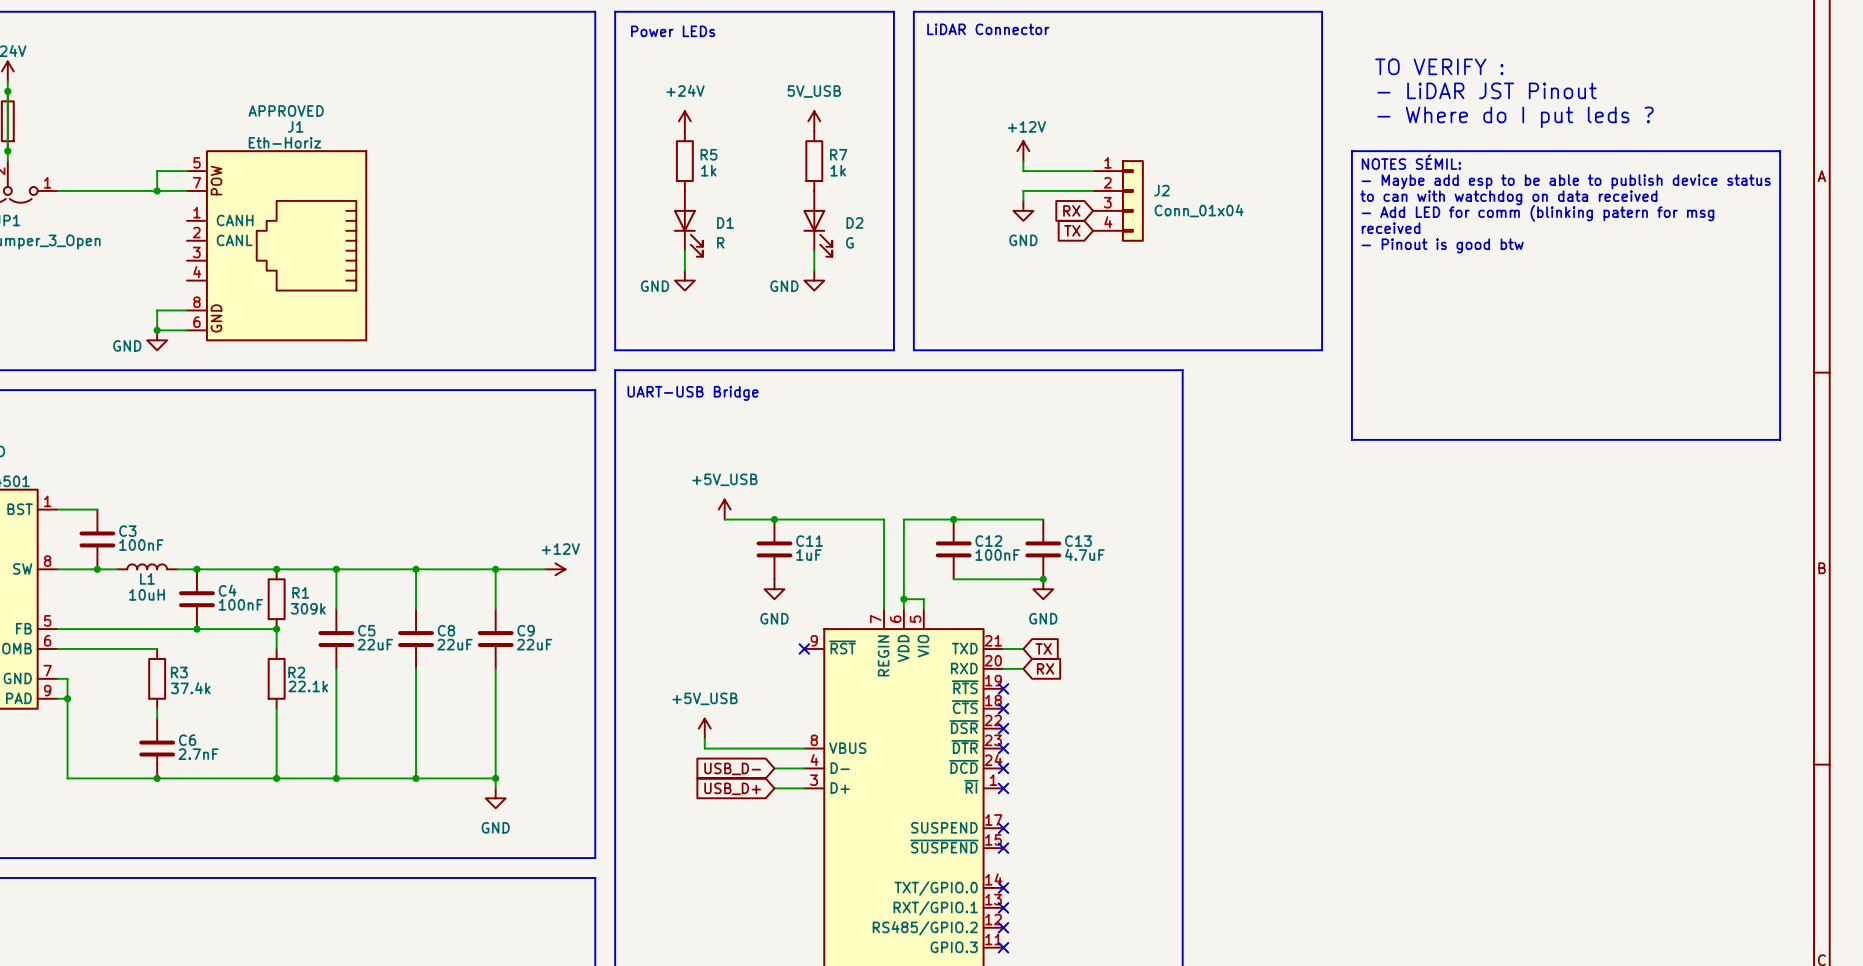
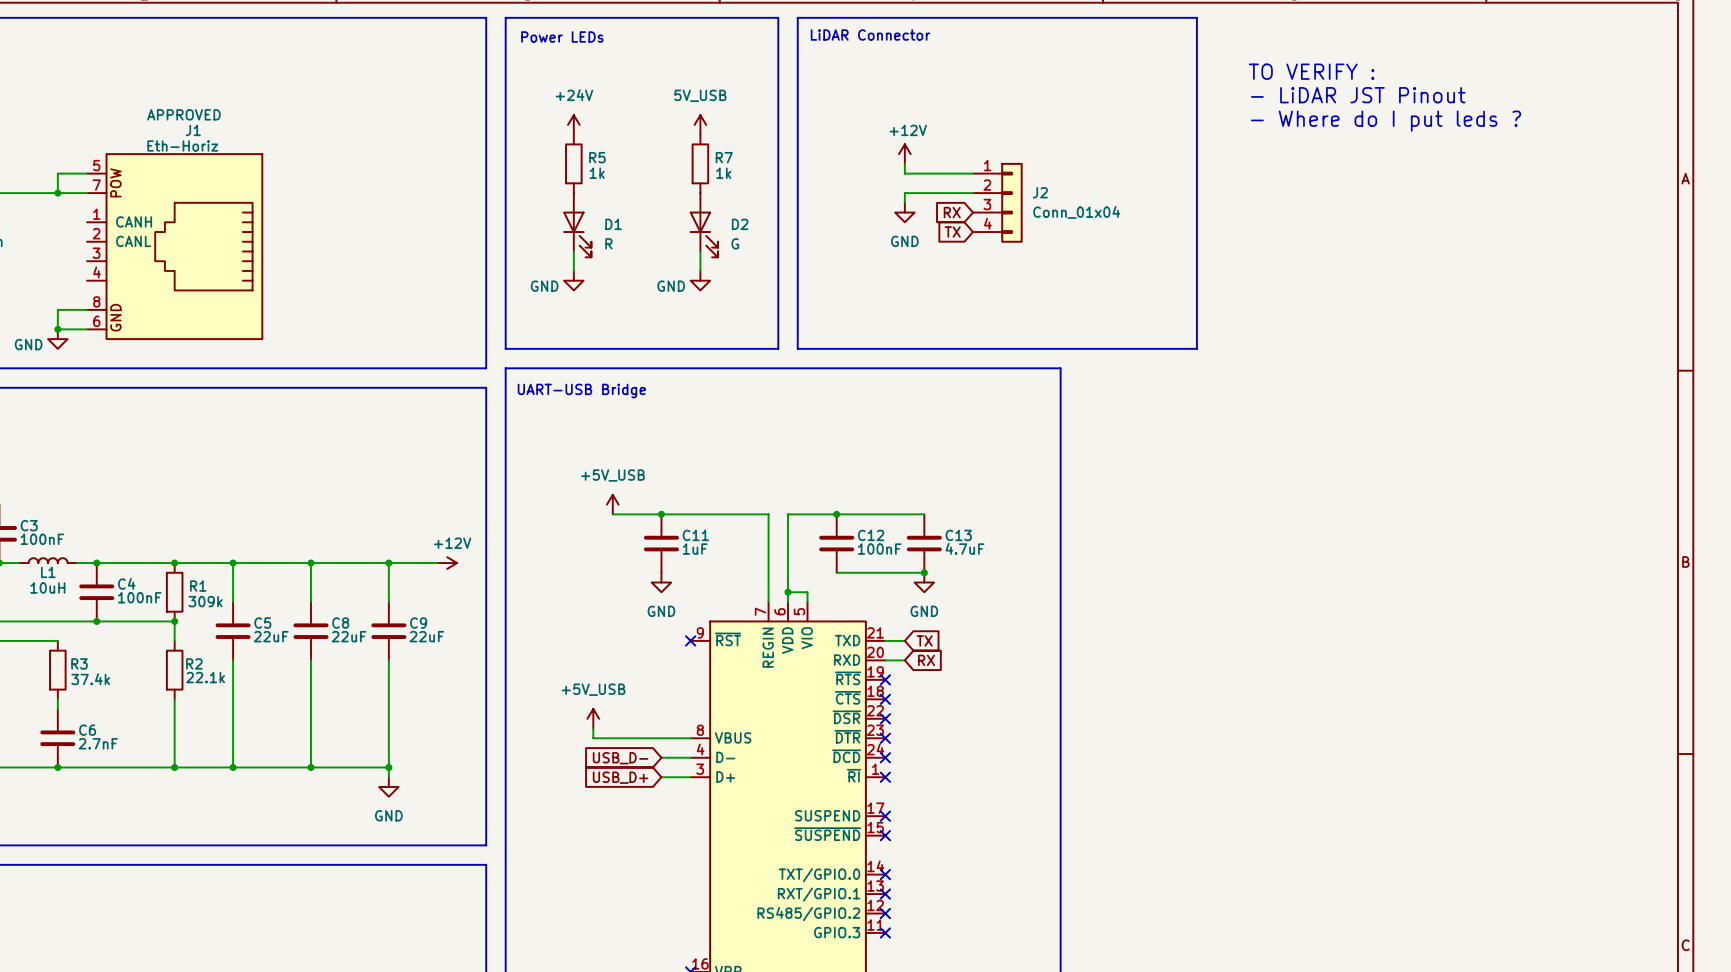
line: (1351, 151) (1780, 151) (1780, 439) (1351, 439) (1351, 151) -> none
text: NOTES SÉMIL: (1411, 162) -> none
text: - Maybe add esp to be able to publish device status (1566, 181) -> none
text: to can with watchdog on data received (1508, 197) -> none
text: - Add LED for comm (blinking patern for msg (1538, 213) -> none
text: received (1391, 228) -> none
text: - Pinout is good btw (1442, 245) -> none

